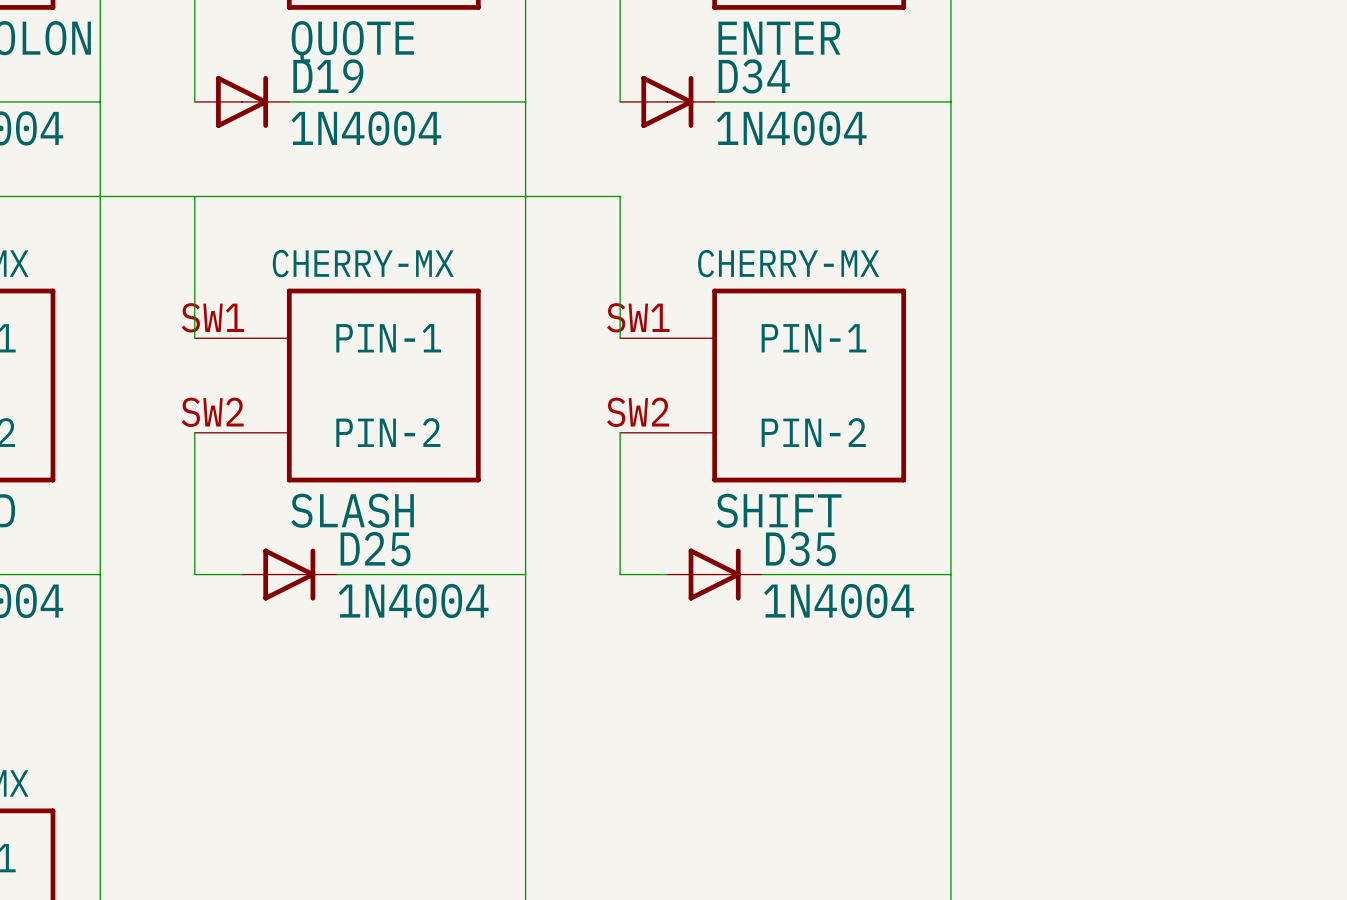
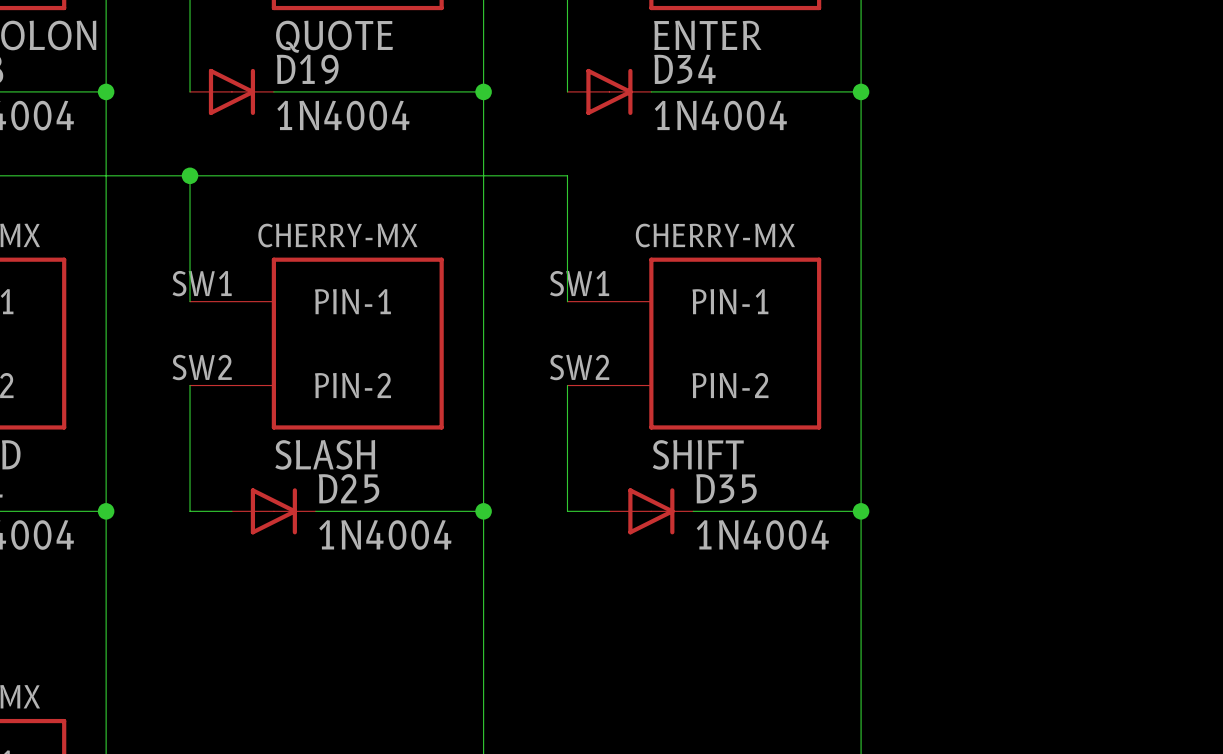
junction: none -> (106, 91)
junction: none -> (483, 91)
junction: none -> (861, 91)
junction: none -> (190, 175)
junction: none -> (106, 511)
junction: none -> (483, 511)
junction: none -> (861, 511)

